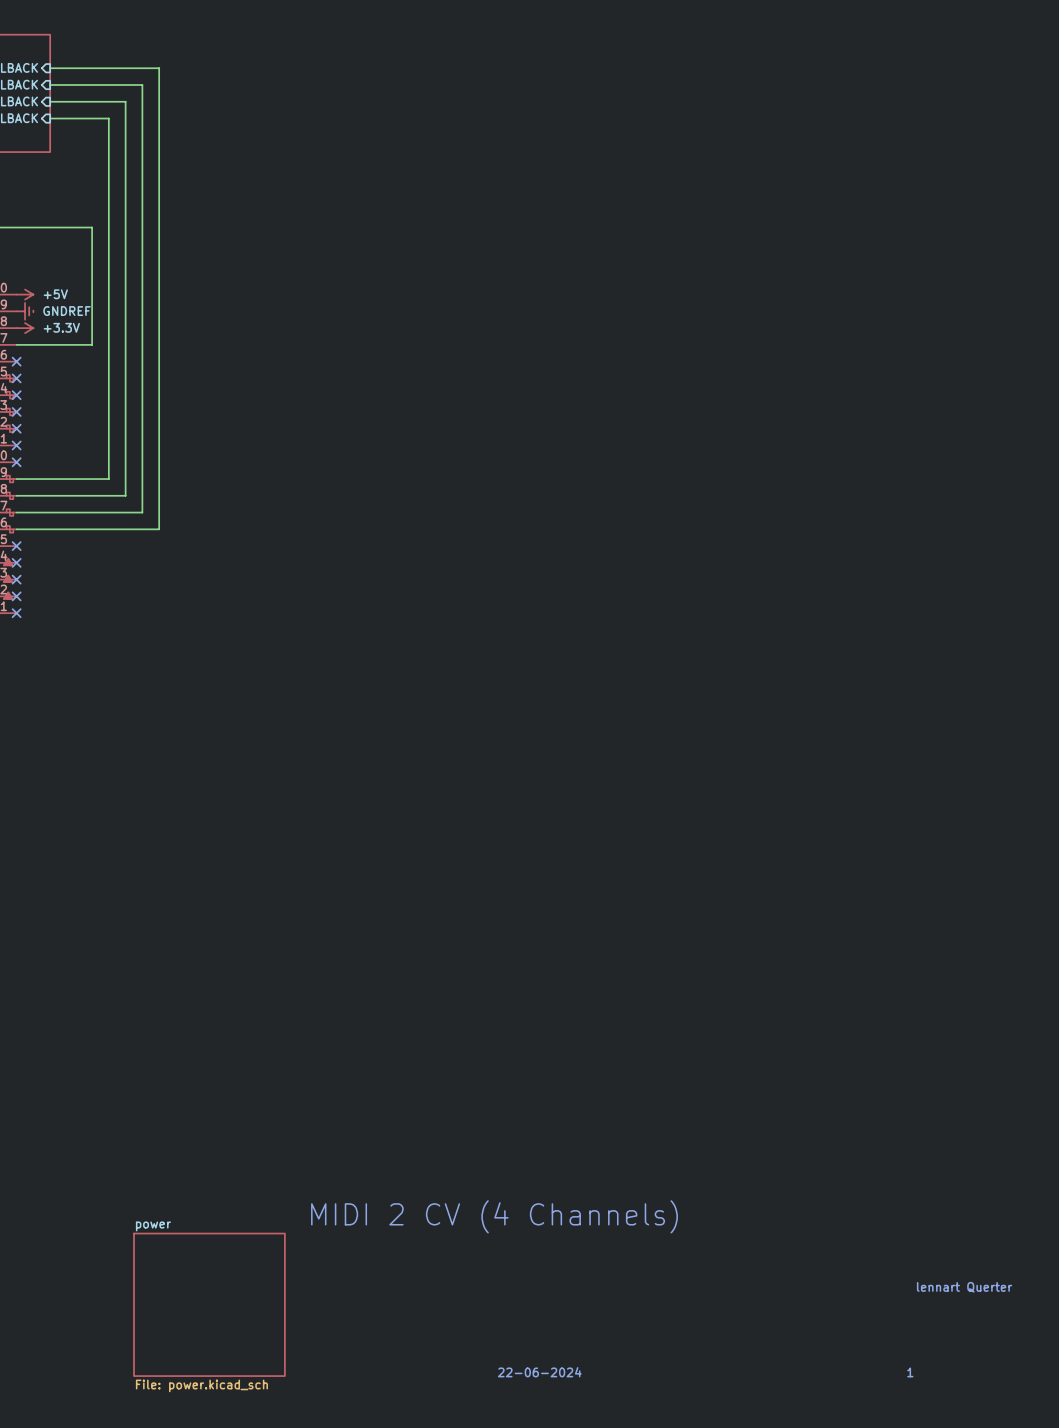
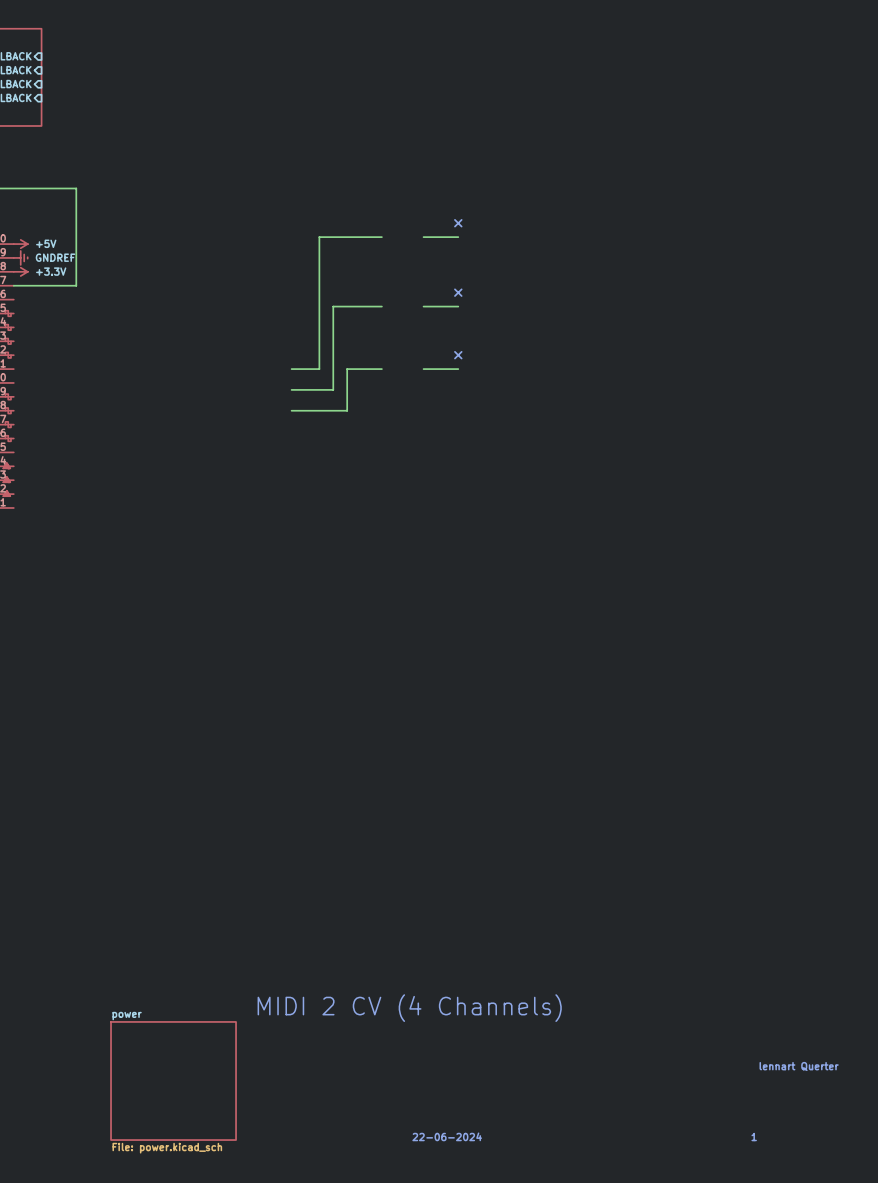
wire: (50, 68) (159, 68) (159, 529) (16, 529) -> none
wire: (50, 85) (142, 85) (142, 512) (16, 512) -> none
wire: (50, 101) (125, 101) (125, 495) (16, 495) -> none
wire: (50, 118) (108, 118) (108, 479) (16, 479) -> none
no-connect mark: none -> (458, 223)
wire: none -> (381, 237) (319, 237) (319, 369) (291, 369)
wire: none -> (423, 237) (458, 237)
no-connect mark: none -> (458, 292)
no-connect mark: (16, 361) -> none
wire: none -> (381, 306) (333, 306) (333, 389) (291, 389)
wire: none -> (423, 306) (458, 306)
no-connect mark: (16, 378) -> none
no-connect mark: (16, 395) -> none
no-connect mark: (16, 411) -> none
no-connect mark: (16, 428) -> none
no-connect mark: none -> (458, 355)
no-connect mark: (16, 445) -> none
wire: none -> (381, 369) (347, 369) (347, 410) (291, 410)
wire: none -> (423, 369) (458, 369)
no-connect mark: (16, 462) -> none
no-connect mark: (16, 546) -> none
no-connect mark: (16, 562) -> none
no-connect mark: (16, 579) -> none
no-connect mark: (16, 596) -> none
no-connect mark: (16, 613) -> none

